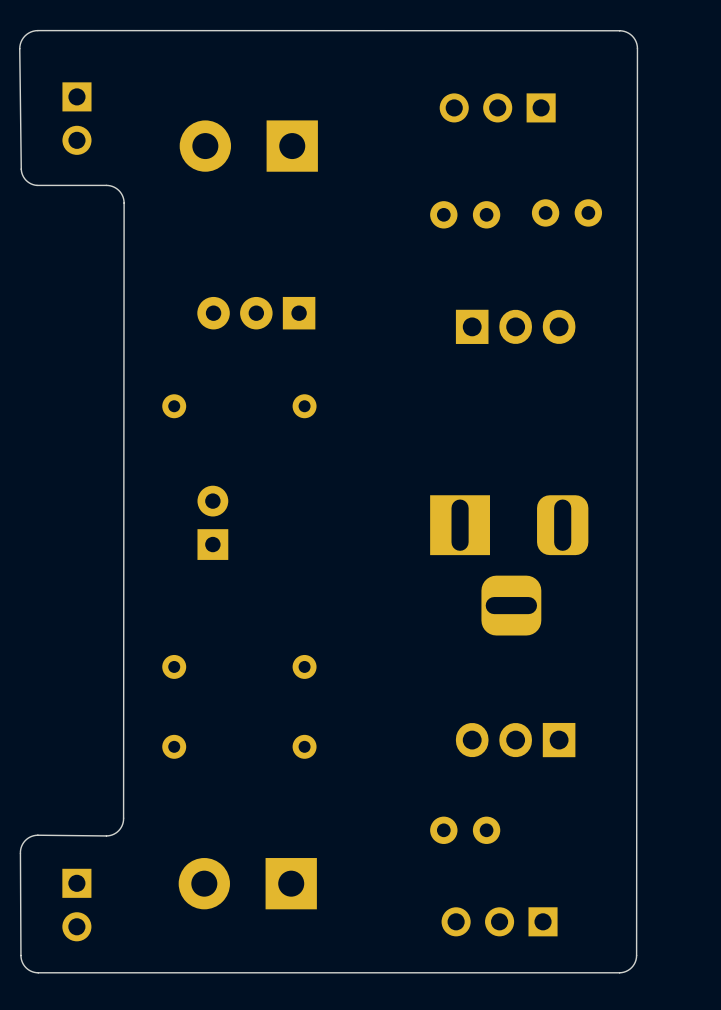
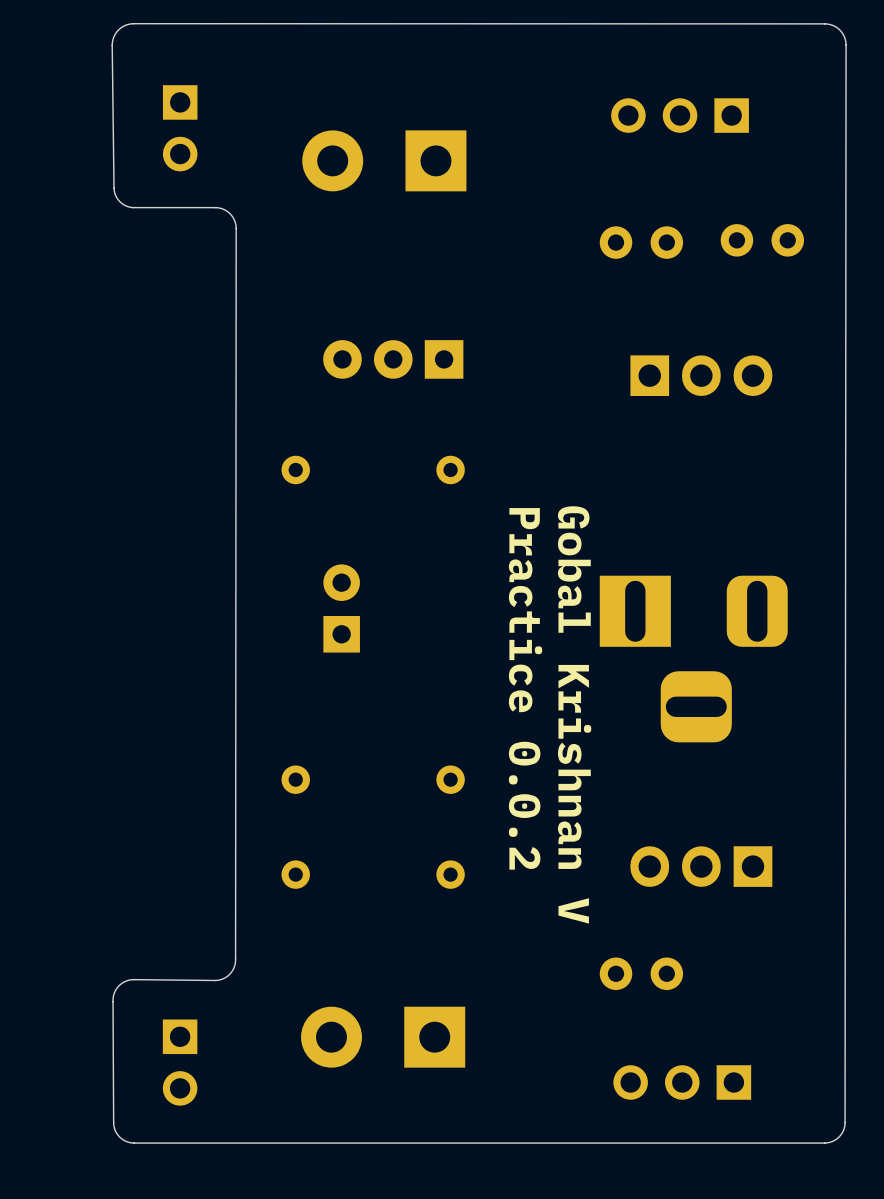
text: none -> Practice 0.0.2 (525, 688)
text: none -> Gobal Krishnan V (574, 714)

